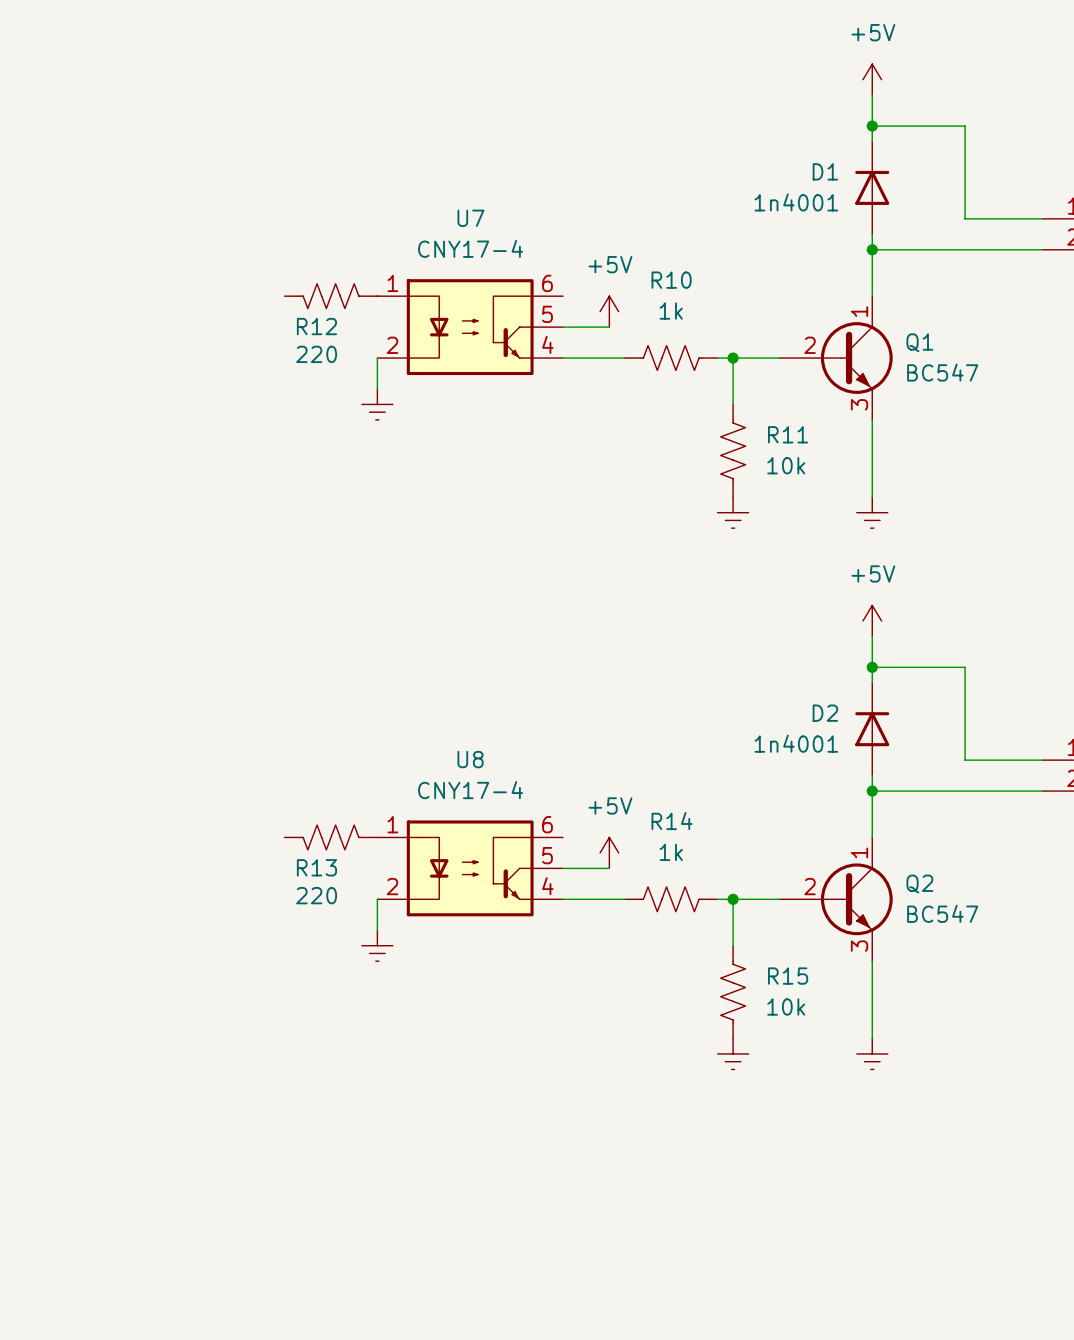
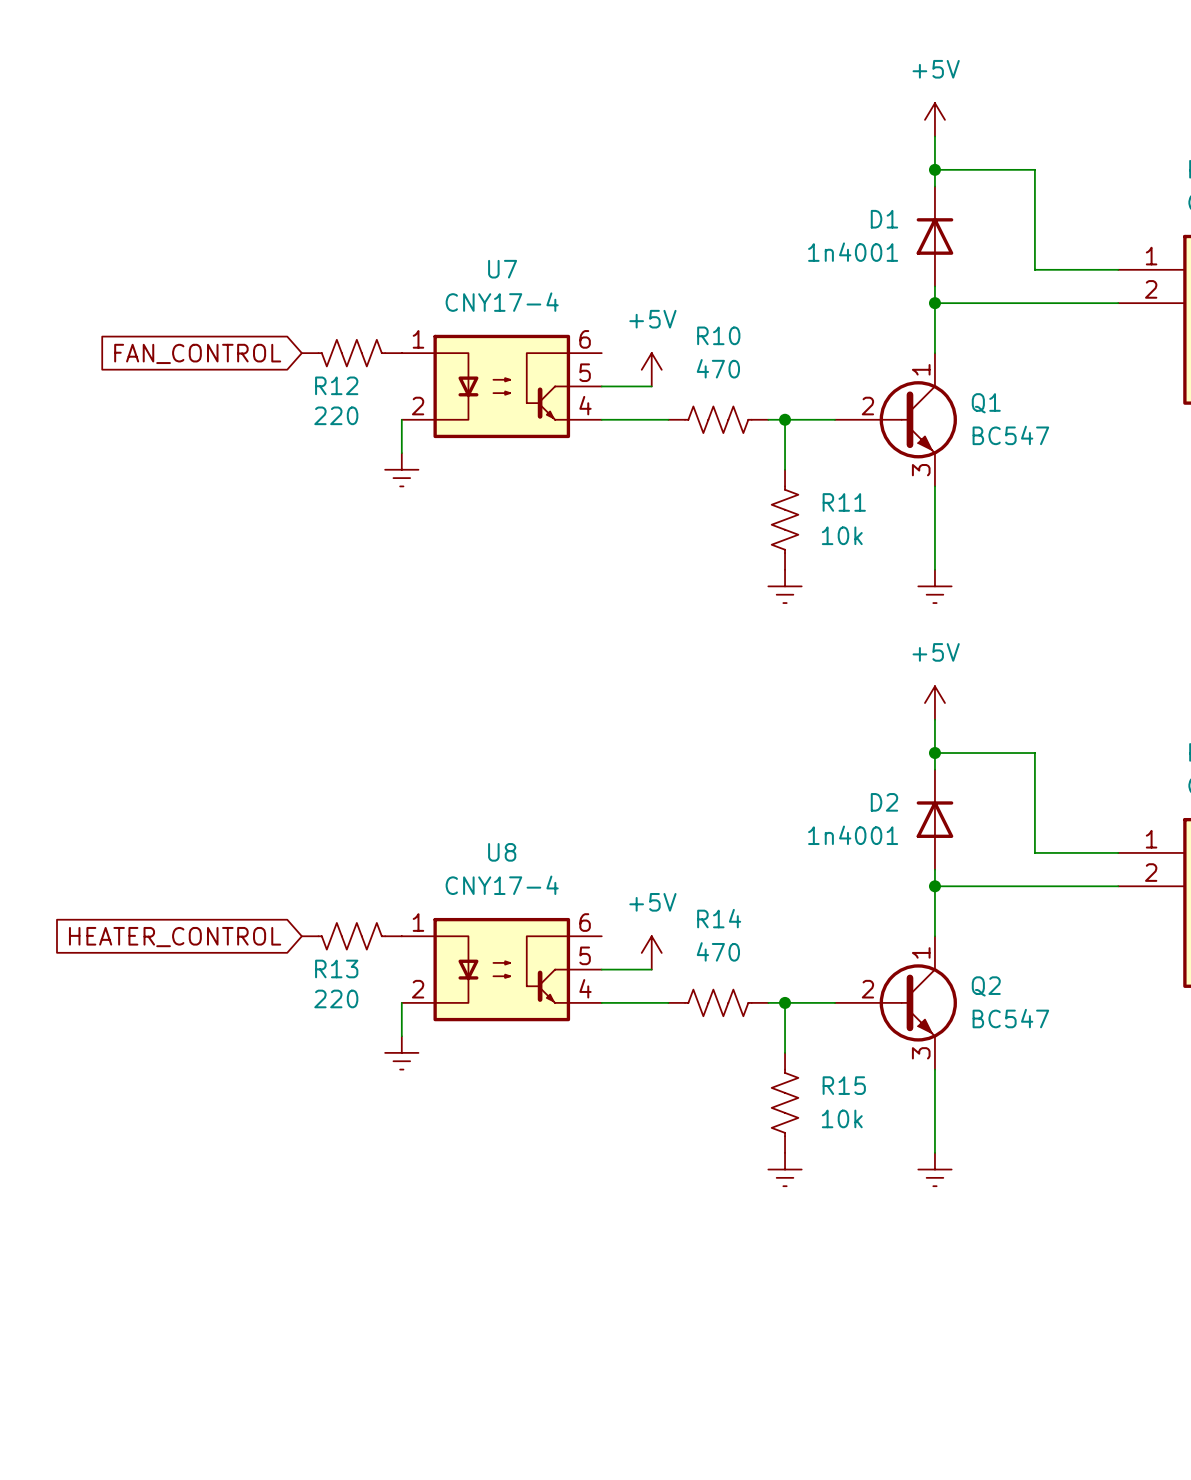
global label: none -> FAN_CONTROL (197, 353)
R10 value: 1k (671, 311) -> 470 (718, 368)
global label: none -> HEATER_CONTROL (175, 937)
R14 value: 1k (671, 852) -> 470 (718, 951)

